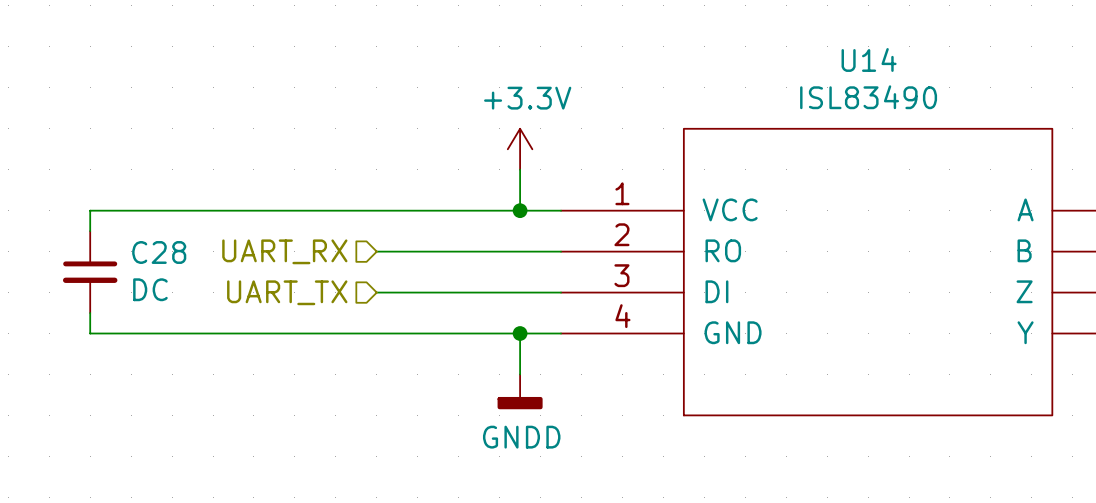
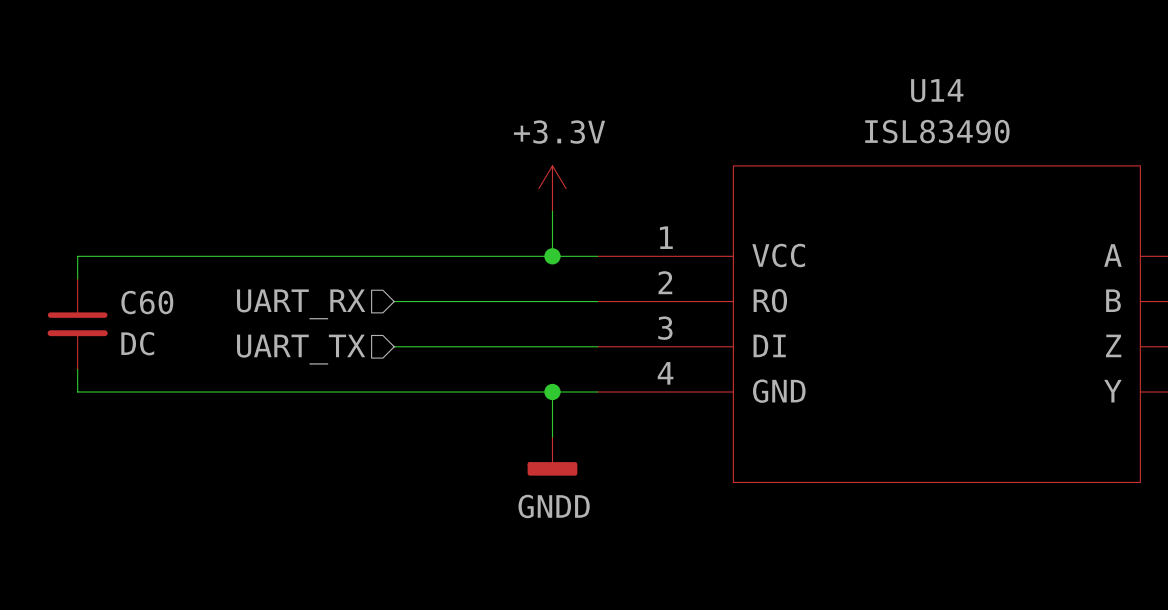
C28 name: C28 (159, 252) -> C60 (147, 302)

